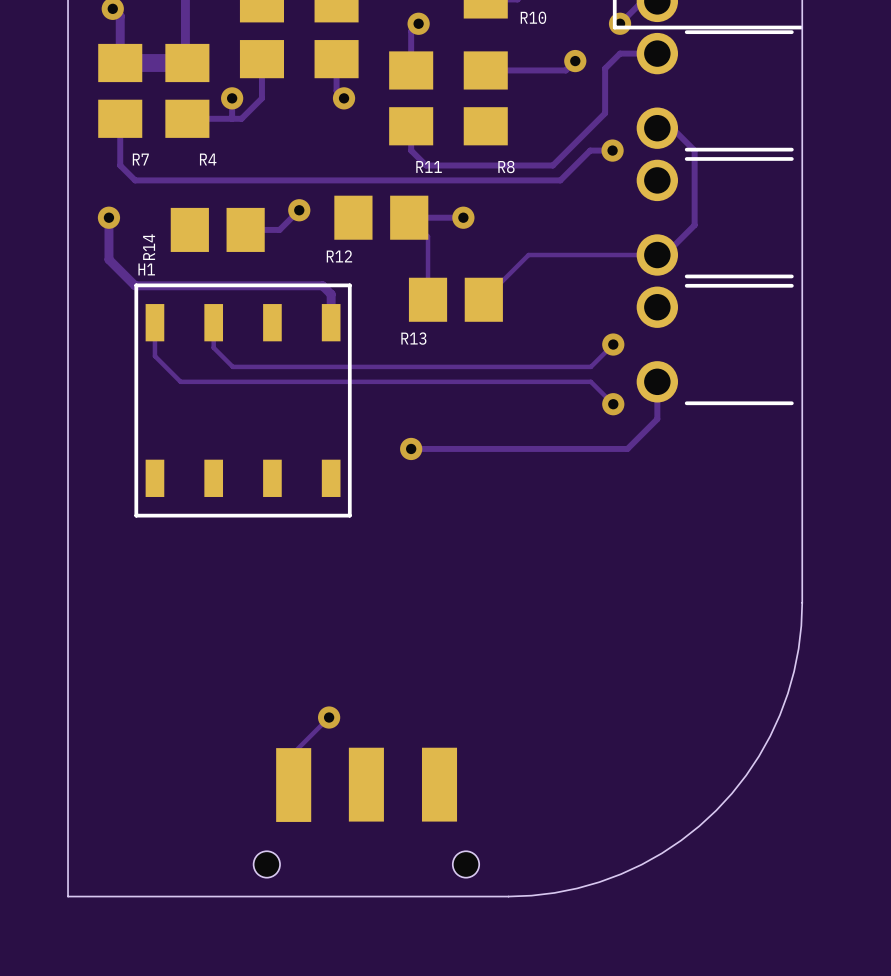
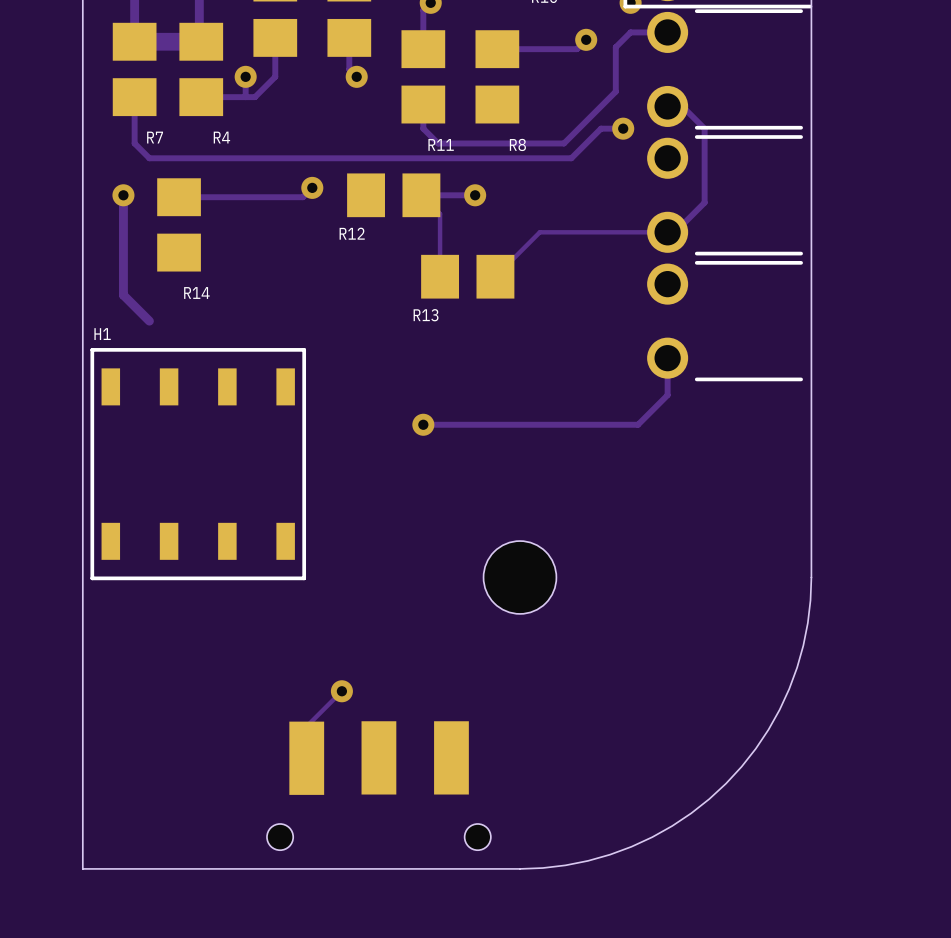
track: (289, 219) (279, 229) (245, 229) -> (302, 197) (179, 197)
R14 rotation: 0° (217, 229) -> 90° clockwise (179, 224)
R14 name position: R14 (149, 247) -> R14 (196, 293)
track: (108, 259) (135, 285) (322, 285) (331, 294) (331, 322) -> (123, 236) (123, 295) (149, 321)
track: (154, 322) (154, 356) (180, 381) (590, 381) (613, 404) -> none
track: (213, 322) (213, 347) (232, 366) (590, 366) (613, 344) -> none
via: (613, 344) -> none
H1 position: (243, 400) -> (198, 464)
via: (613, 404) -> none
hole: none -> (519, 577)

